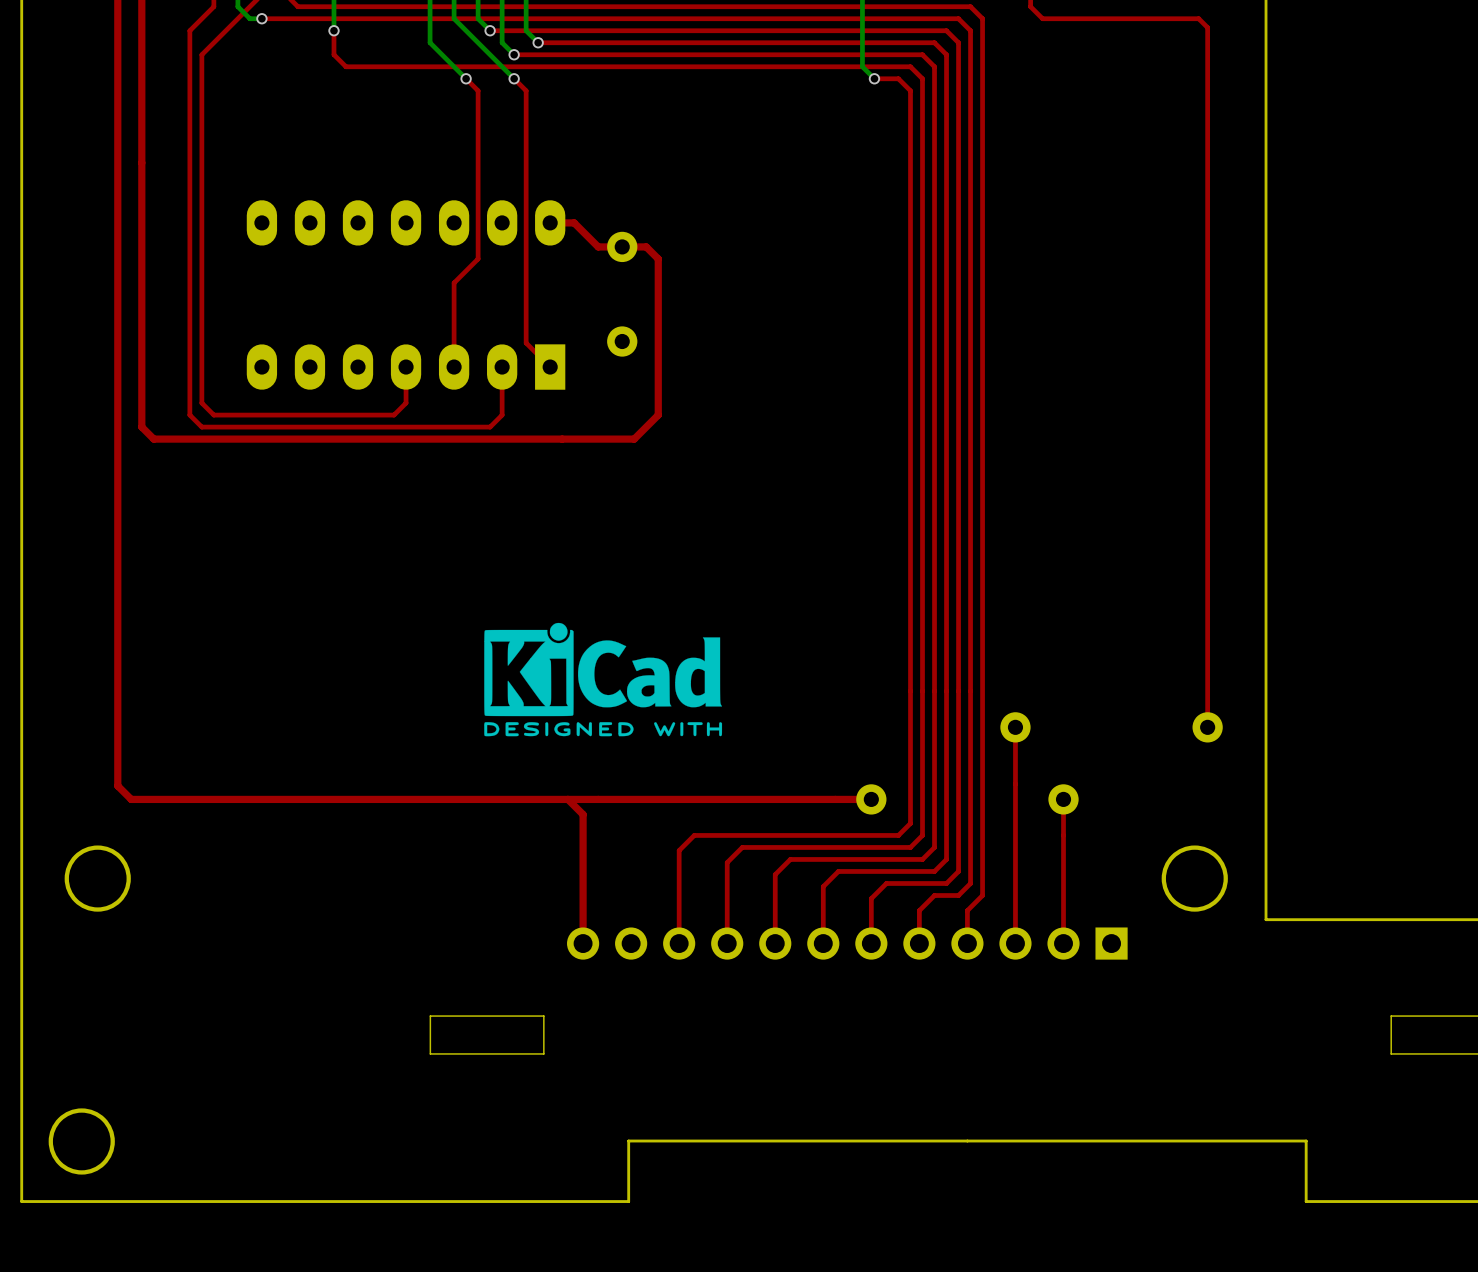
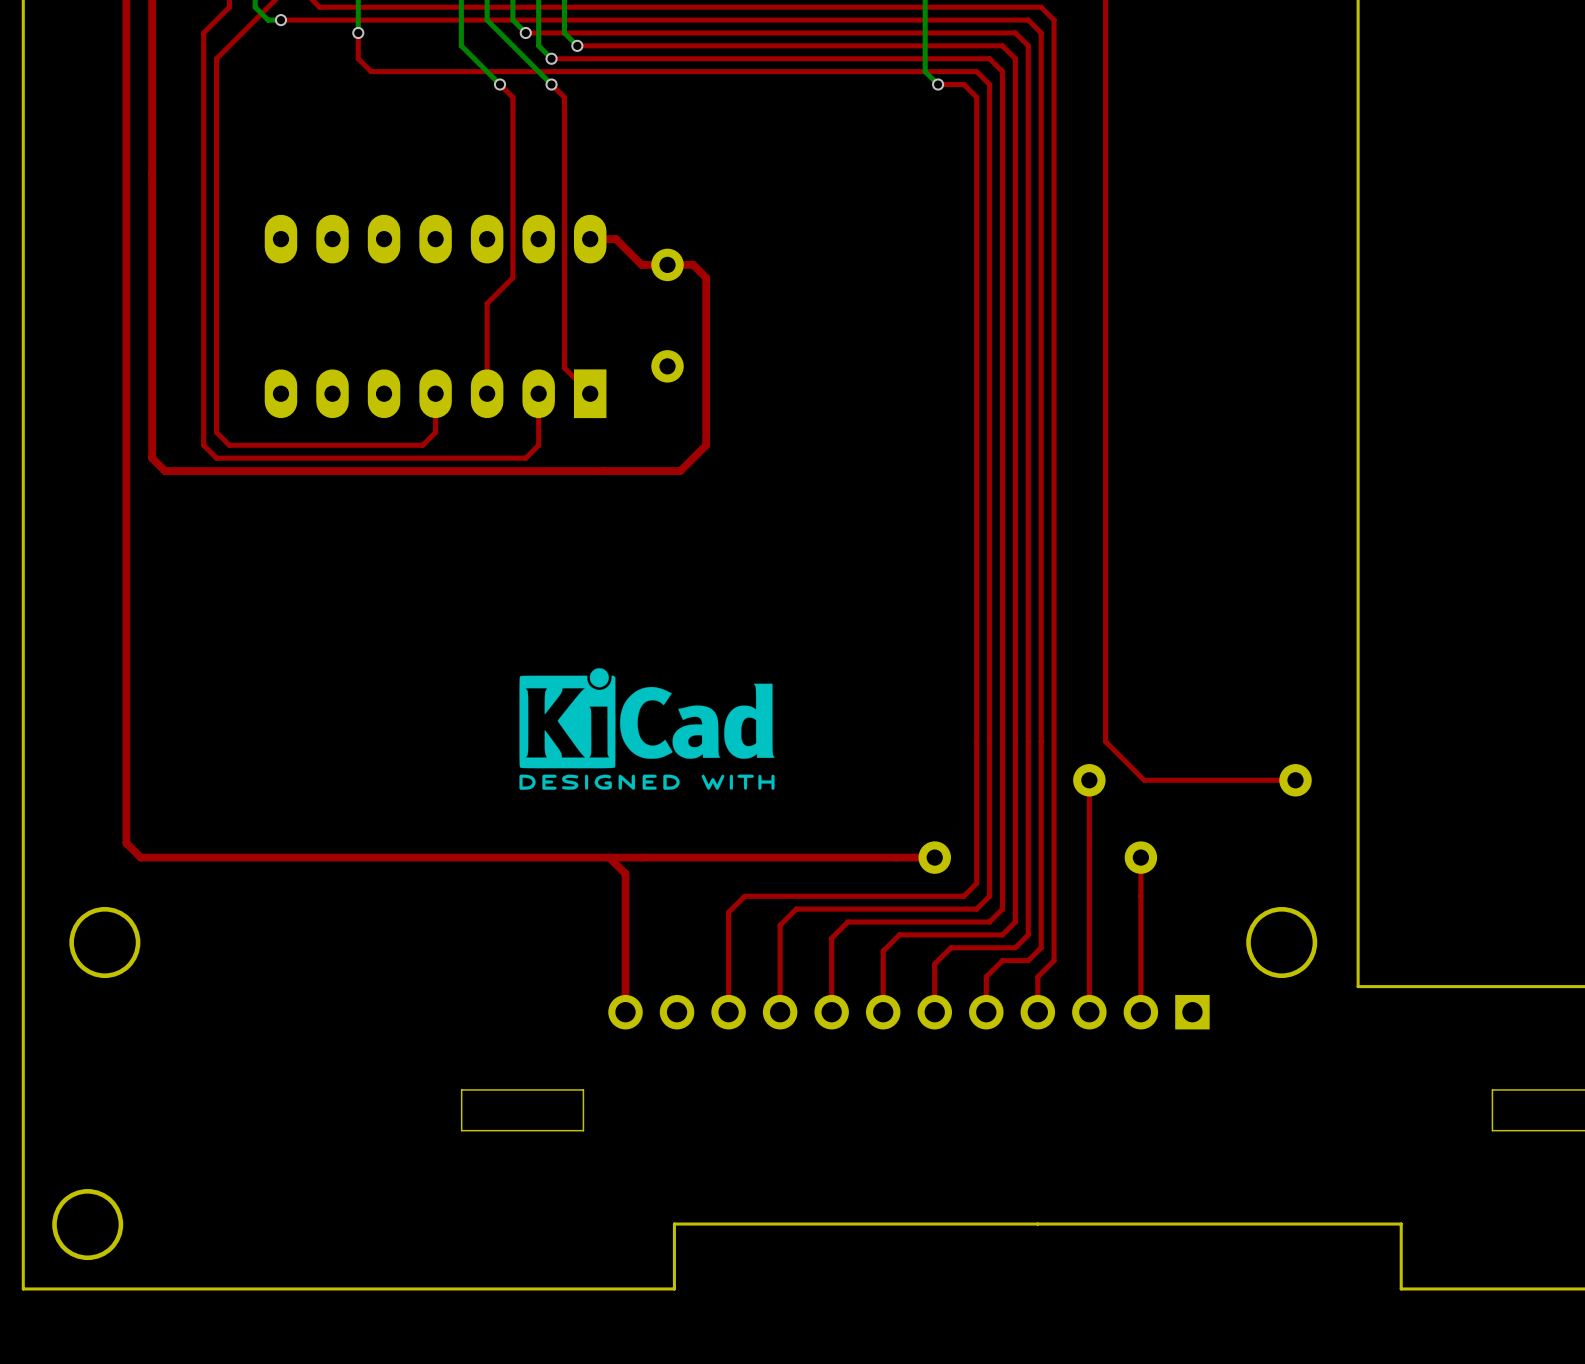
top track: (1030, 6) (1042, 18) (1198, 18) (1207, 27) (1207, 727) -> (1105, 7) (1105, 741) (1144, 780) (1295, 780)

